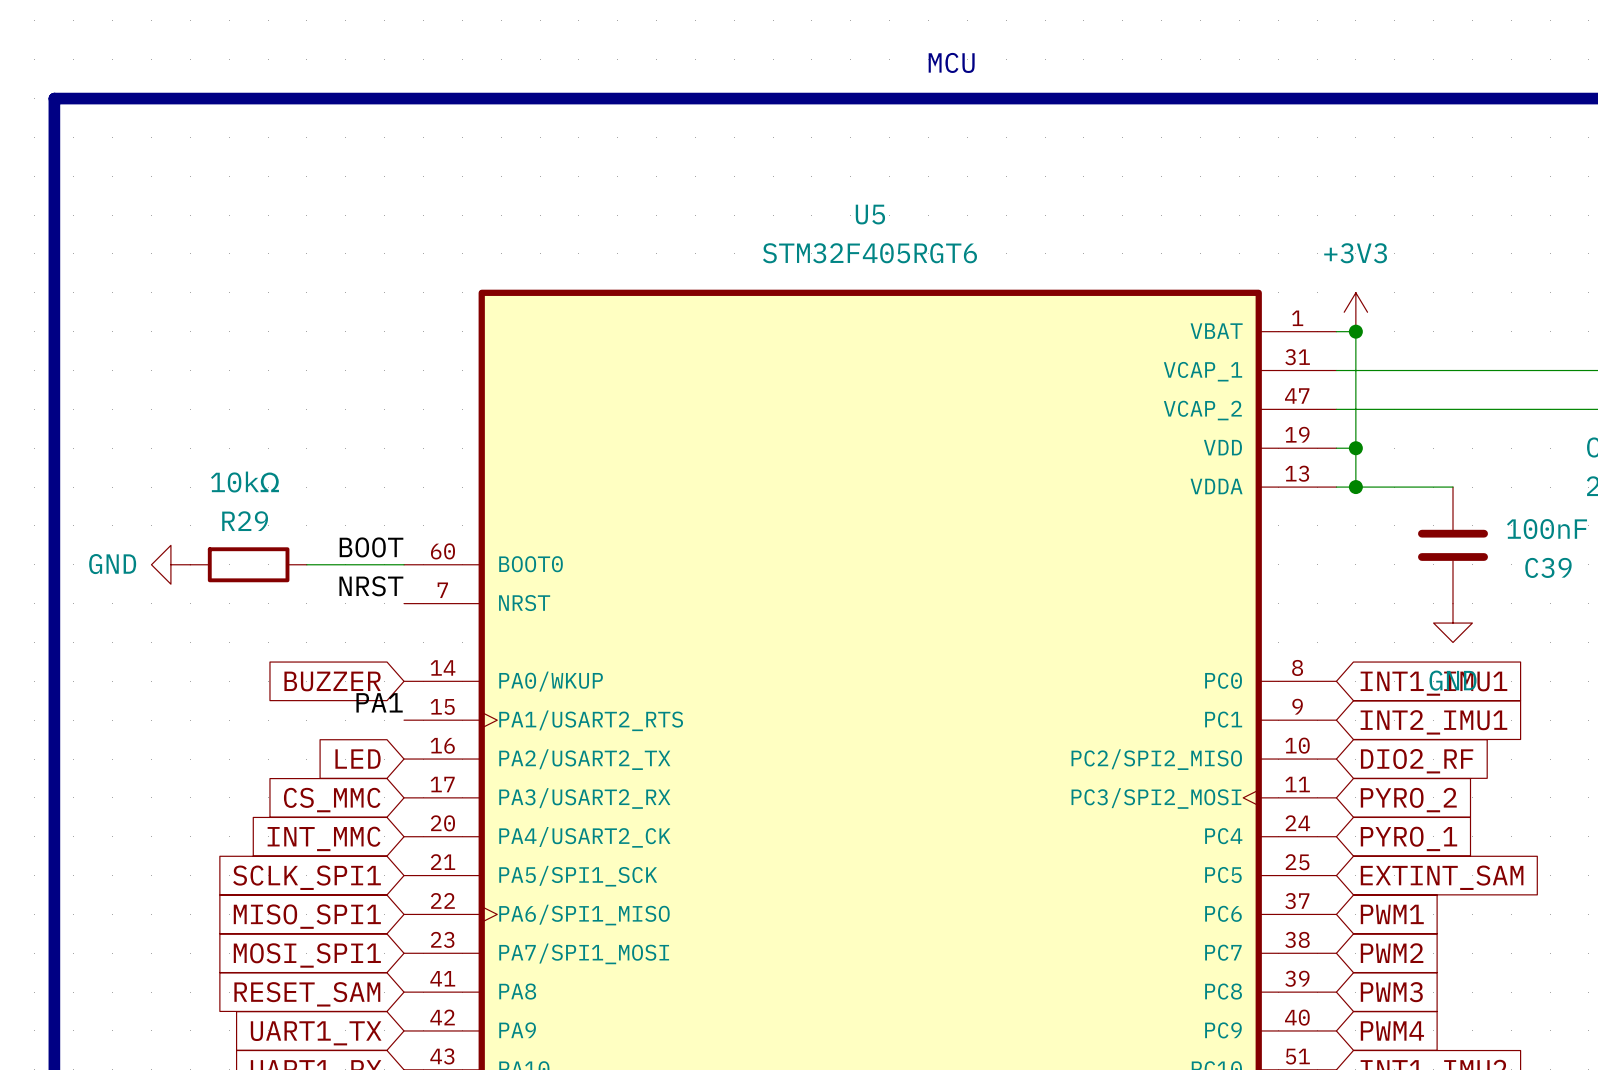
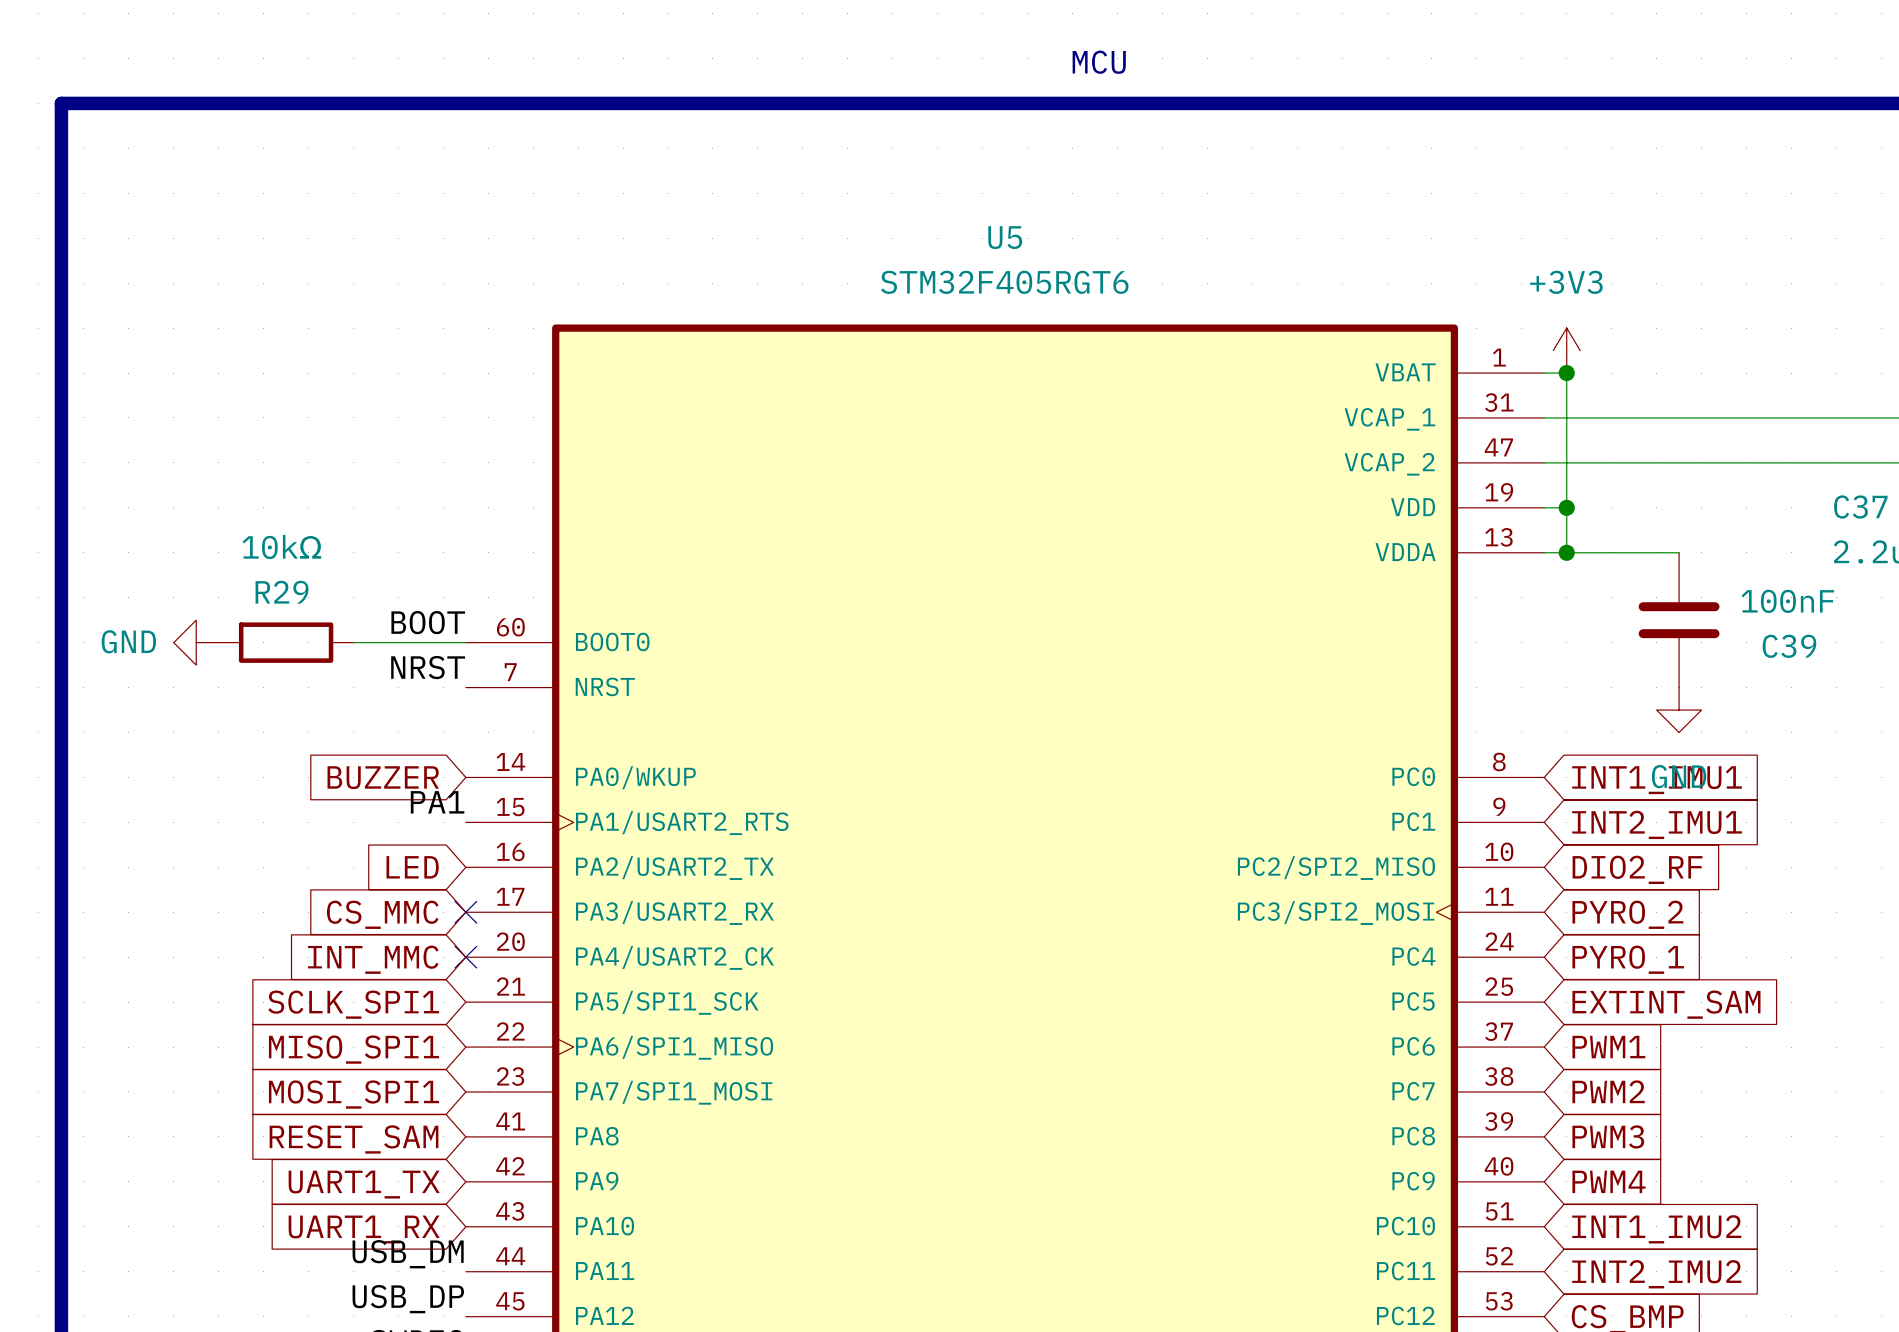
no-connect mark: none -> (465, 912)
no-connect mark: none -> (465, 957)

